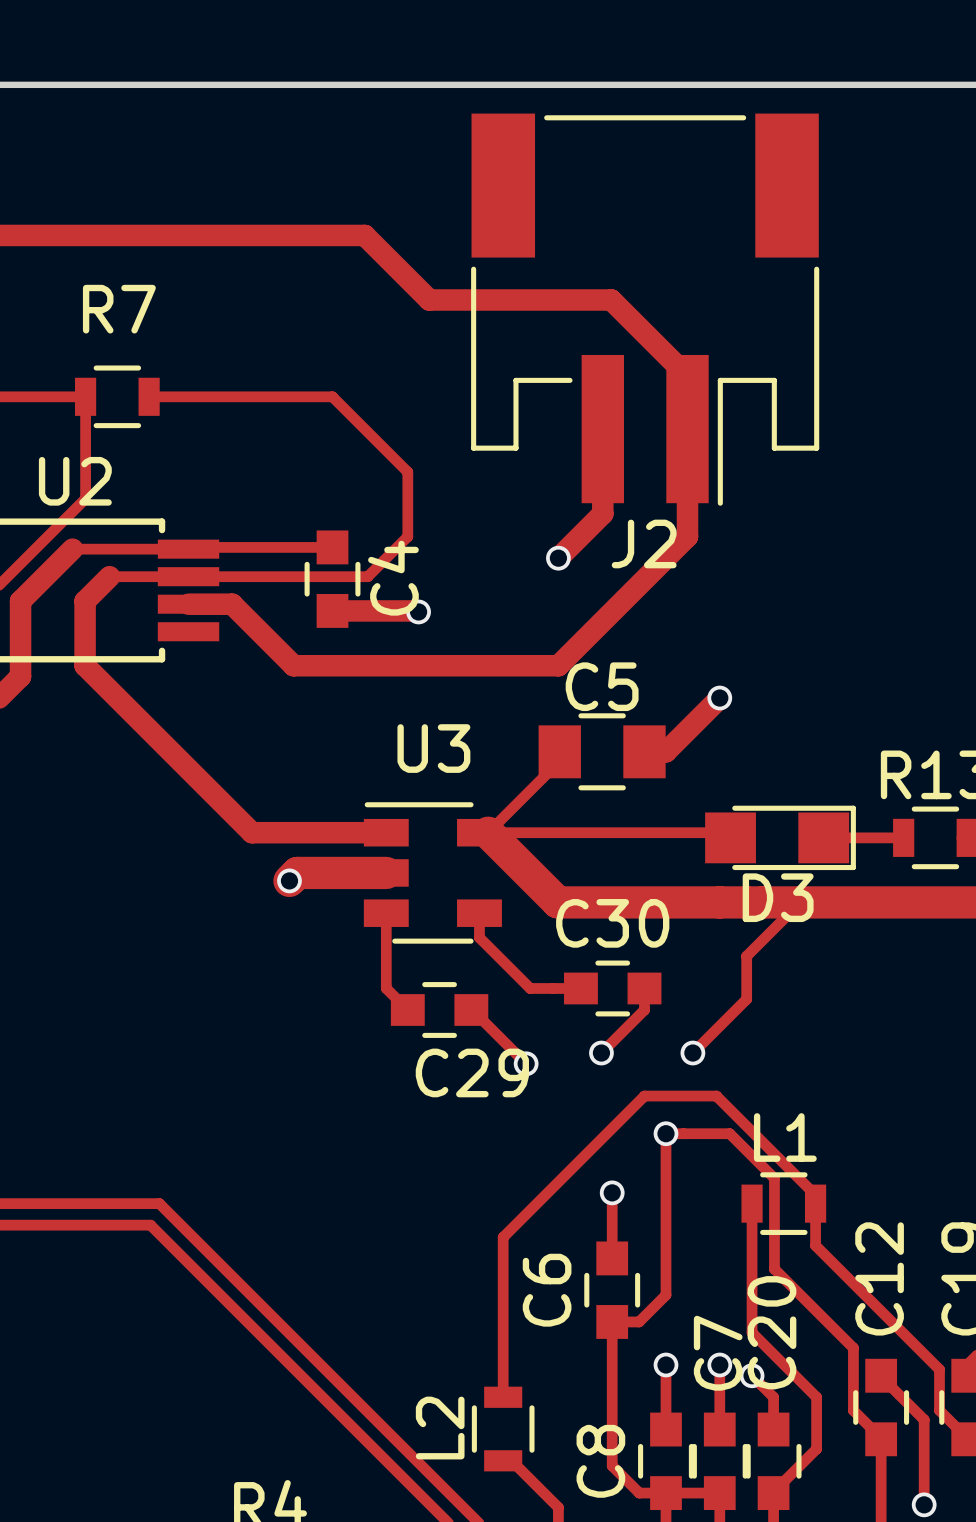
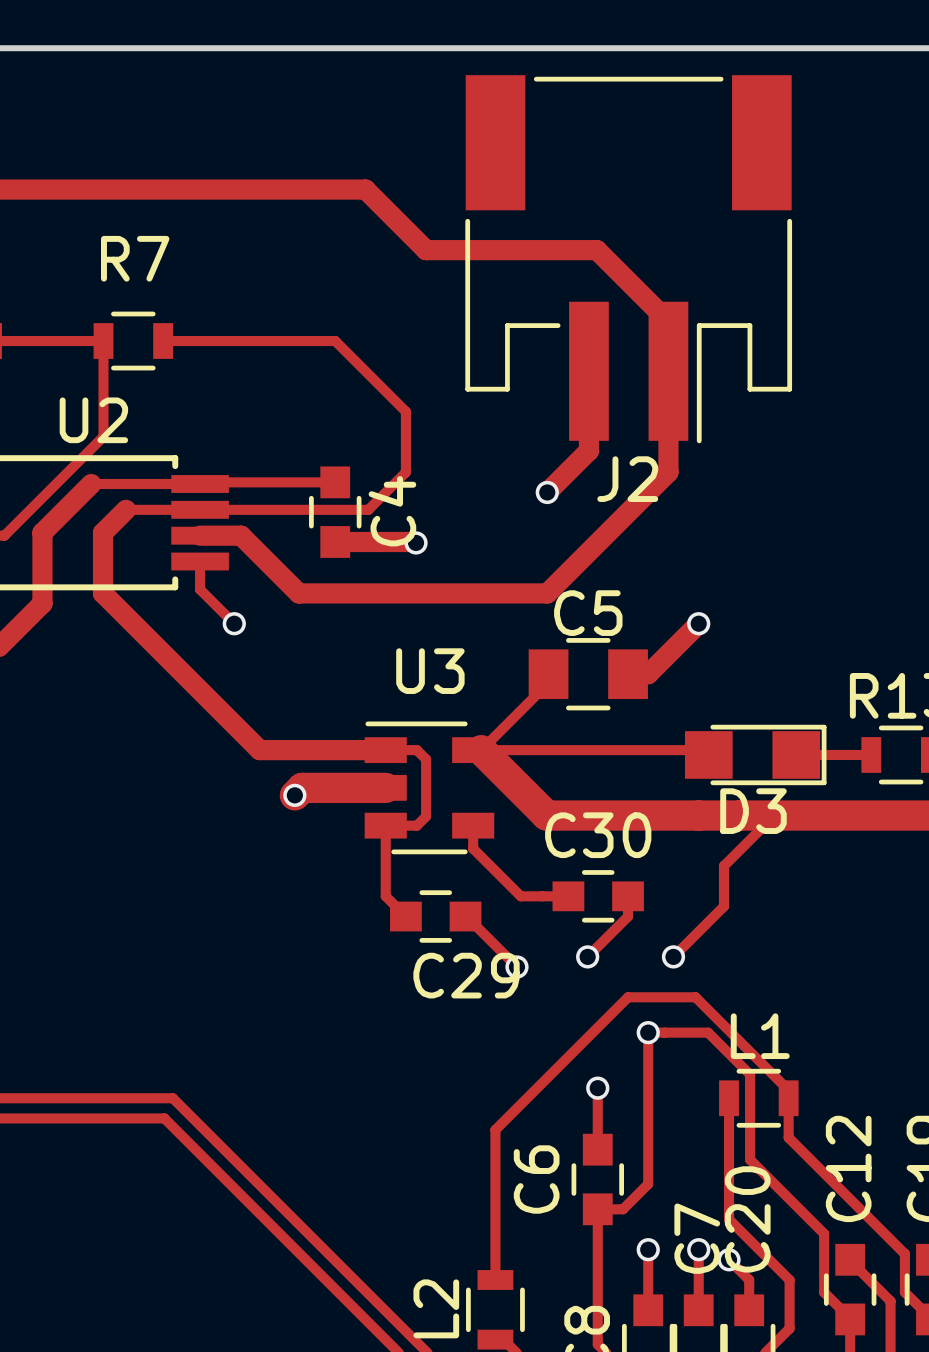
track: none -> (200, 561) (200, 589) (234, 623)
via: none -> (234, 623)
track: none -> (385, 750) (416, 750) (426, 759) (426, 816) (416, 825) (385, 825)

